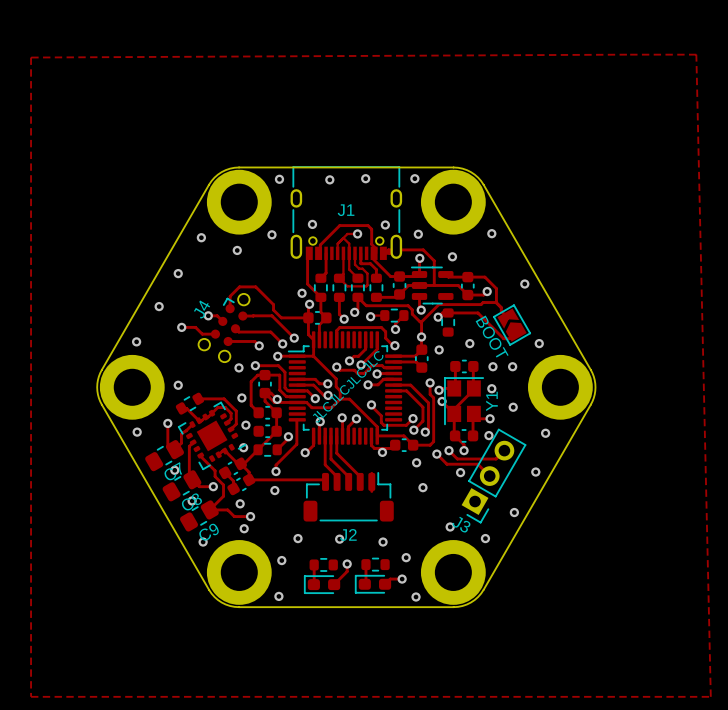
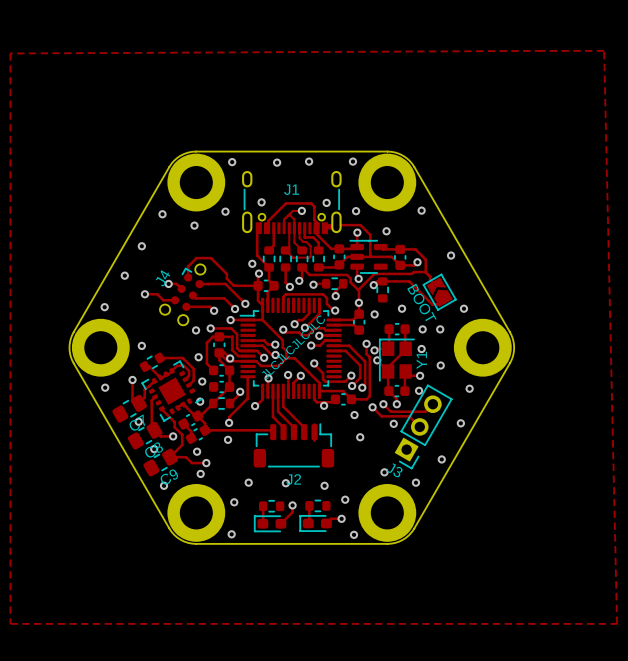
J1 footprint: [290, 166, 403, 260] -> [242, 170, 342, 235]

